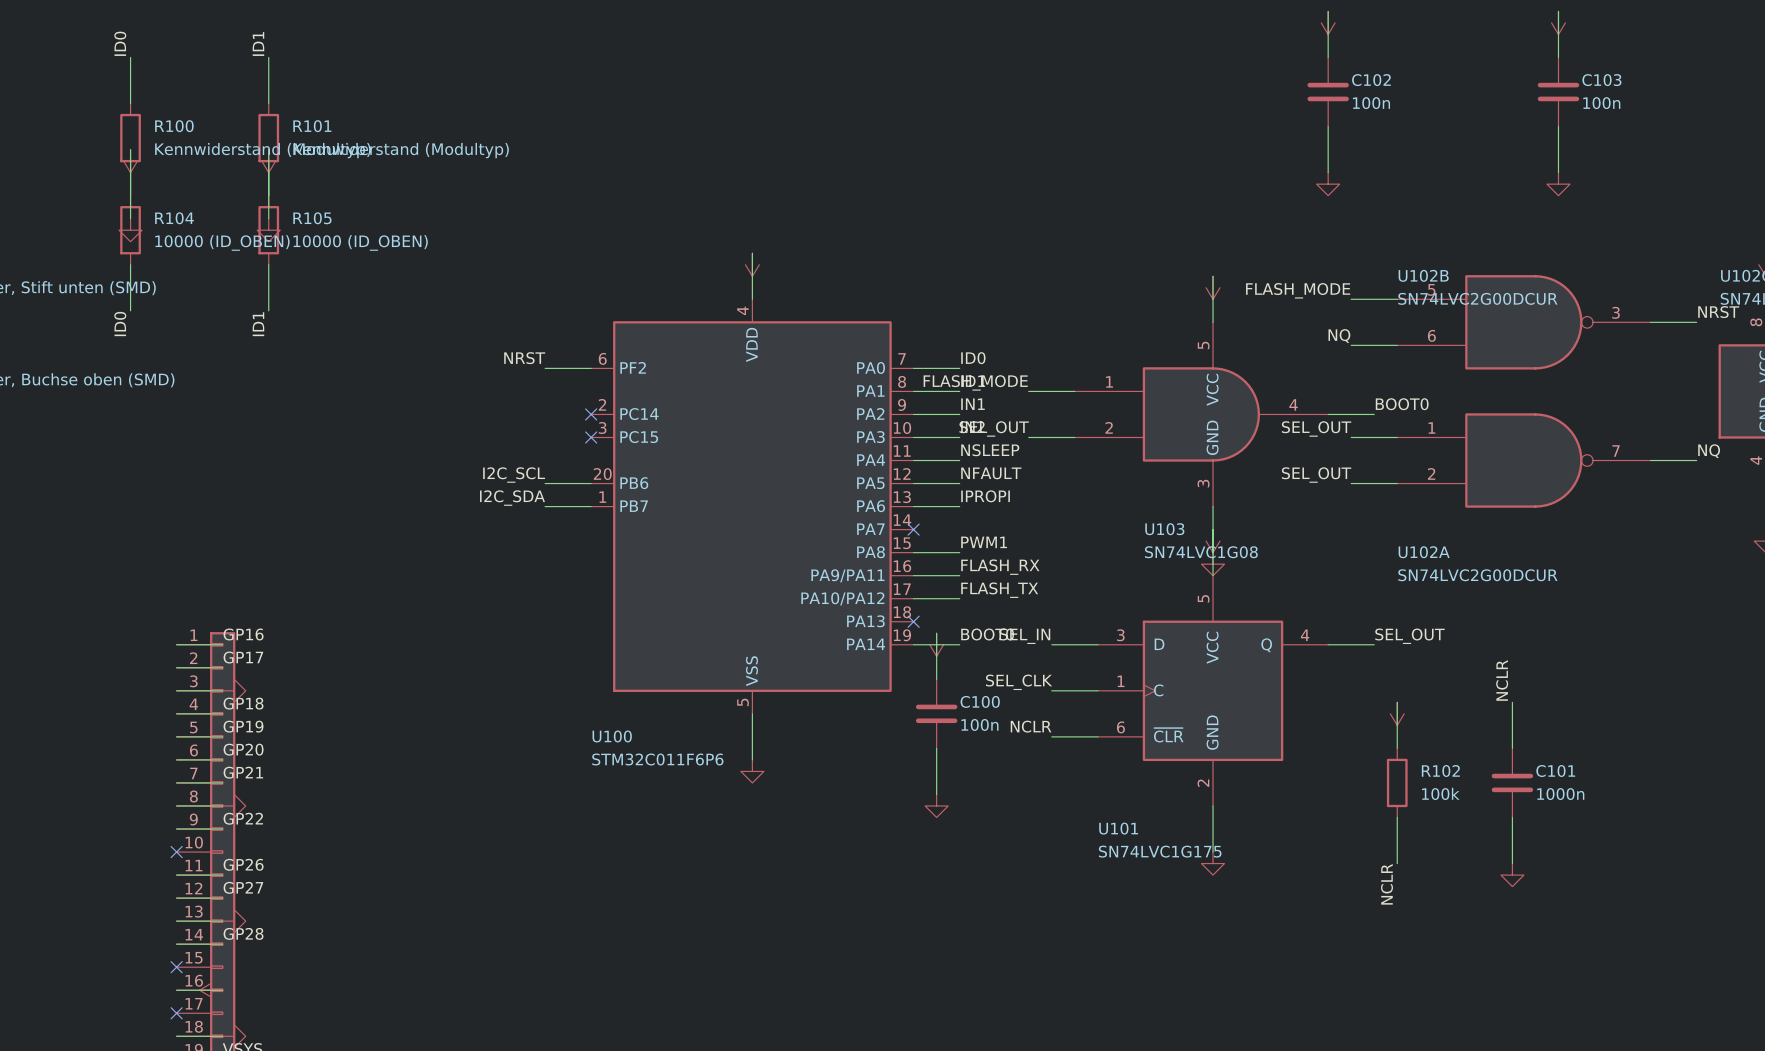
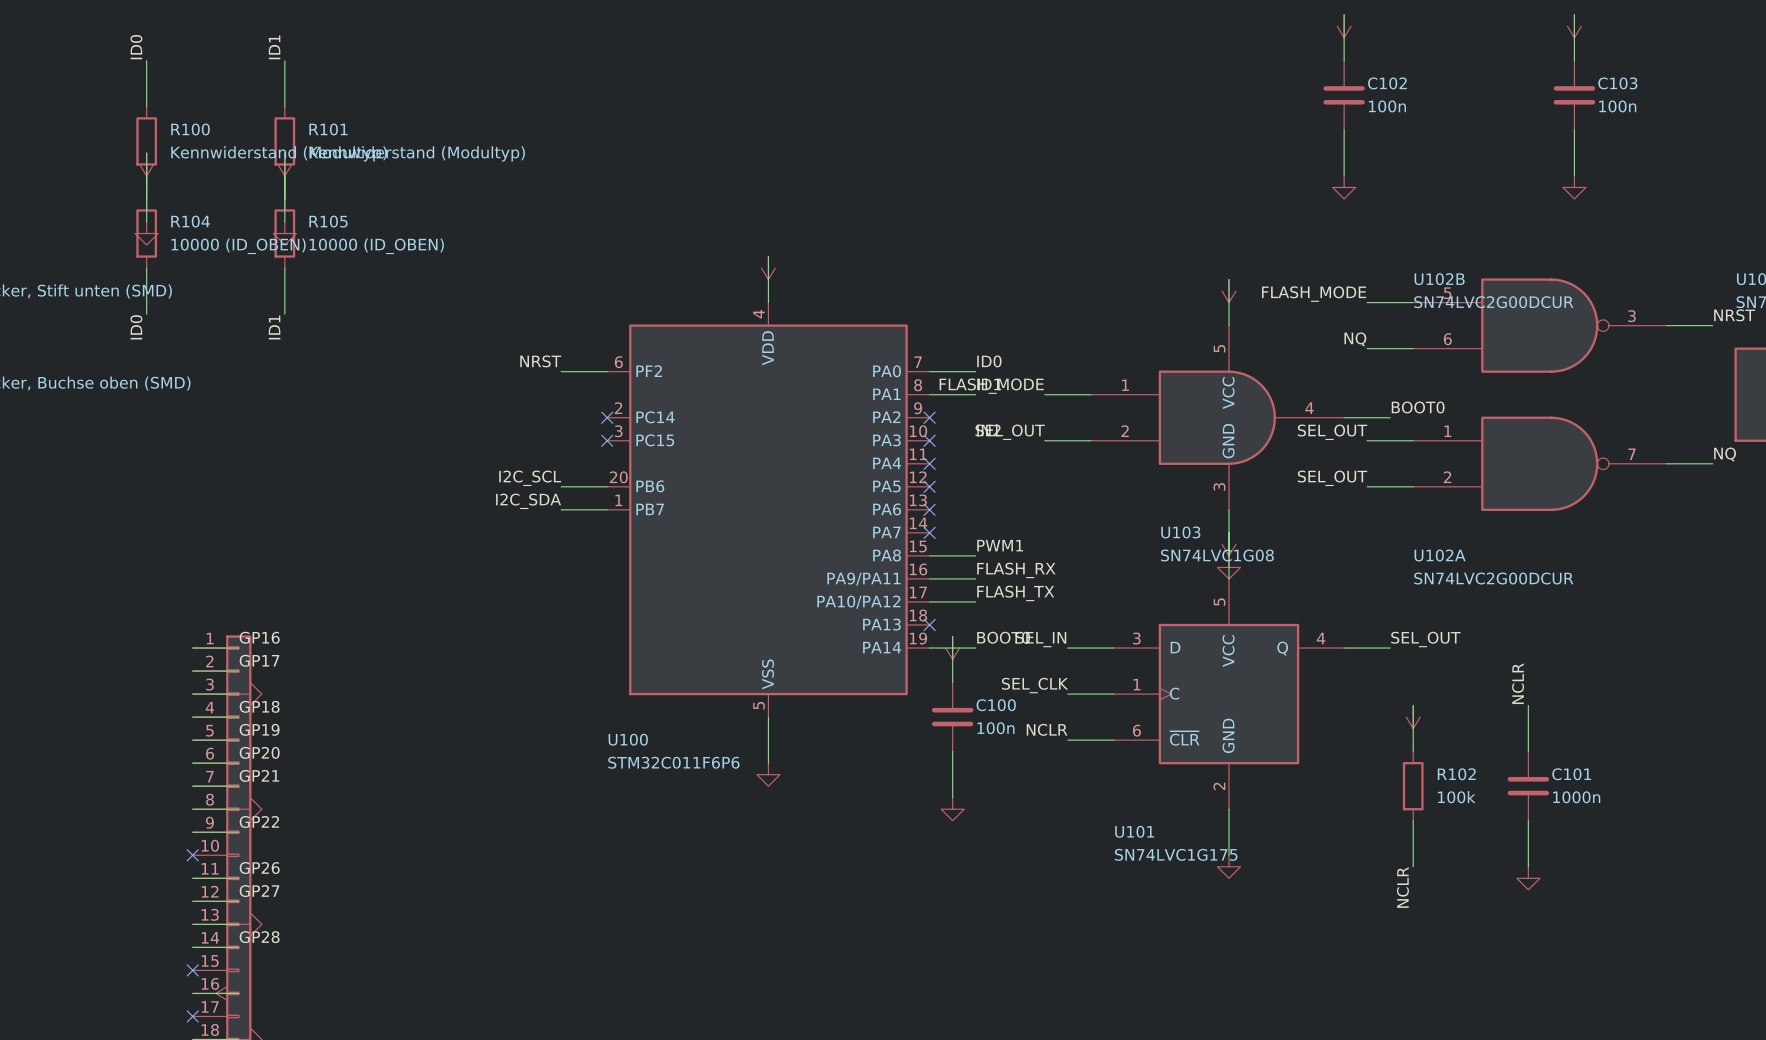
label: IN1 (972, 404) -> none
wire: (913, 414) (959, 414) -> none
no-connect mark: none -> (929, 417)
wire: (913, 437) (959, 437) -> none
no-connect mark: none -> (929, 440)
label: NSLEEP (990, 450) -> none
wire: (913, 460) (959, 460) -> none
no-connect mark: none -> (929, 463)
label: NFAULT (991, 473) -> none
wire: (913, 483) (959, 483) -> none
no-connect mark: none -> (929, 486)
label: IPROPI (985, 496) -> none
wire: (913, 506) (959, 506) -> none
no-connect mark: none -> (929, 509)

